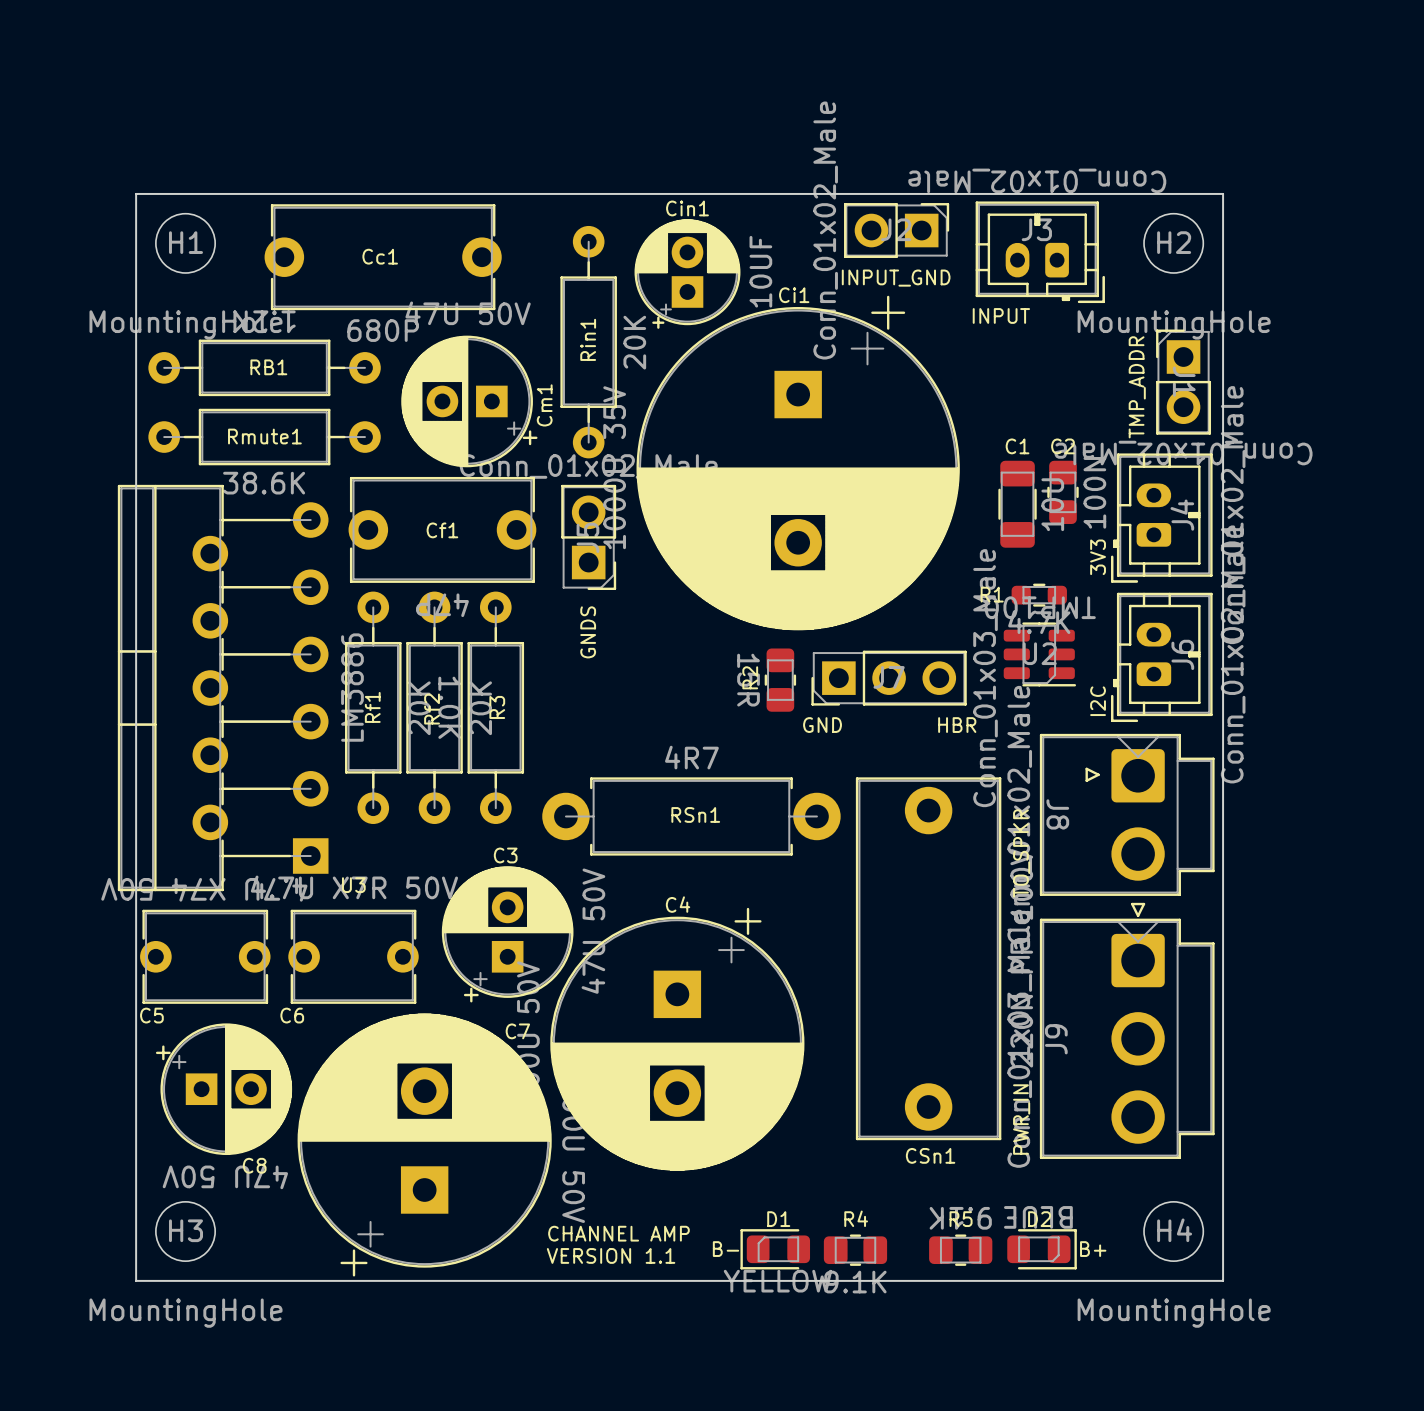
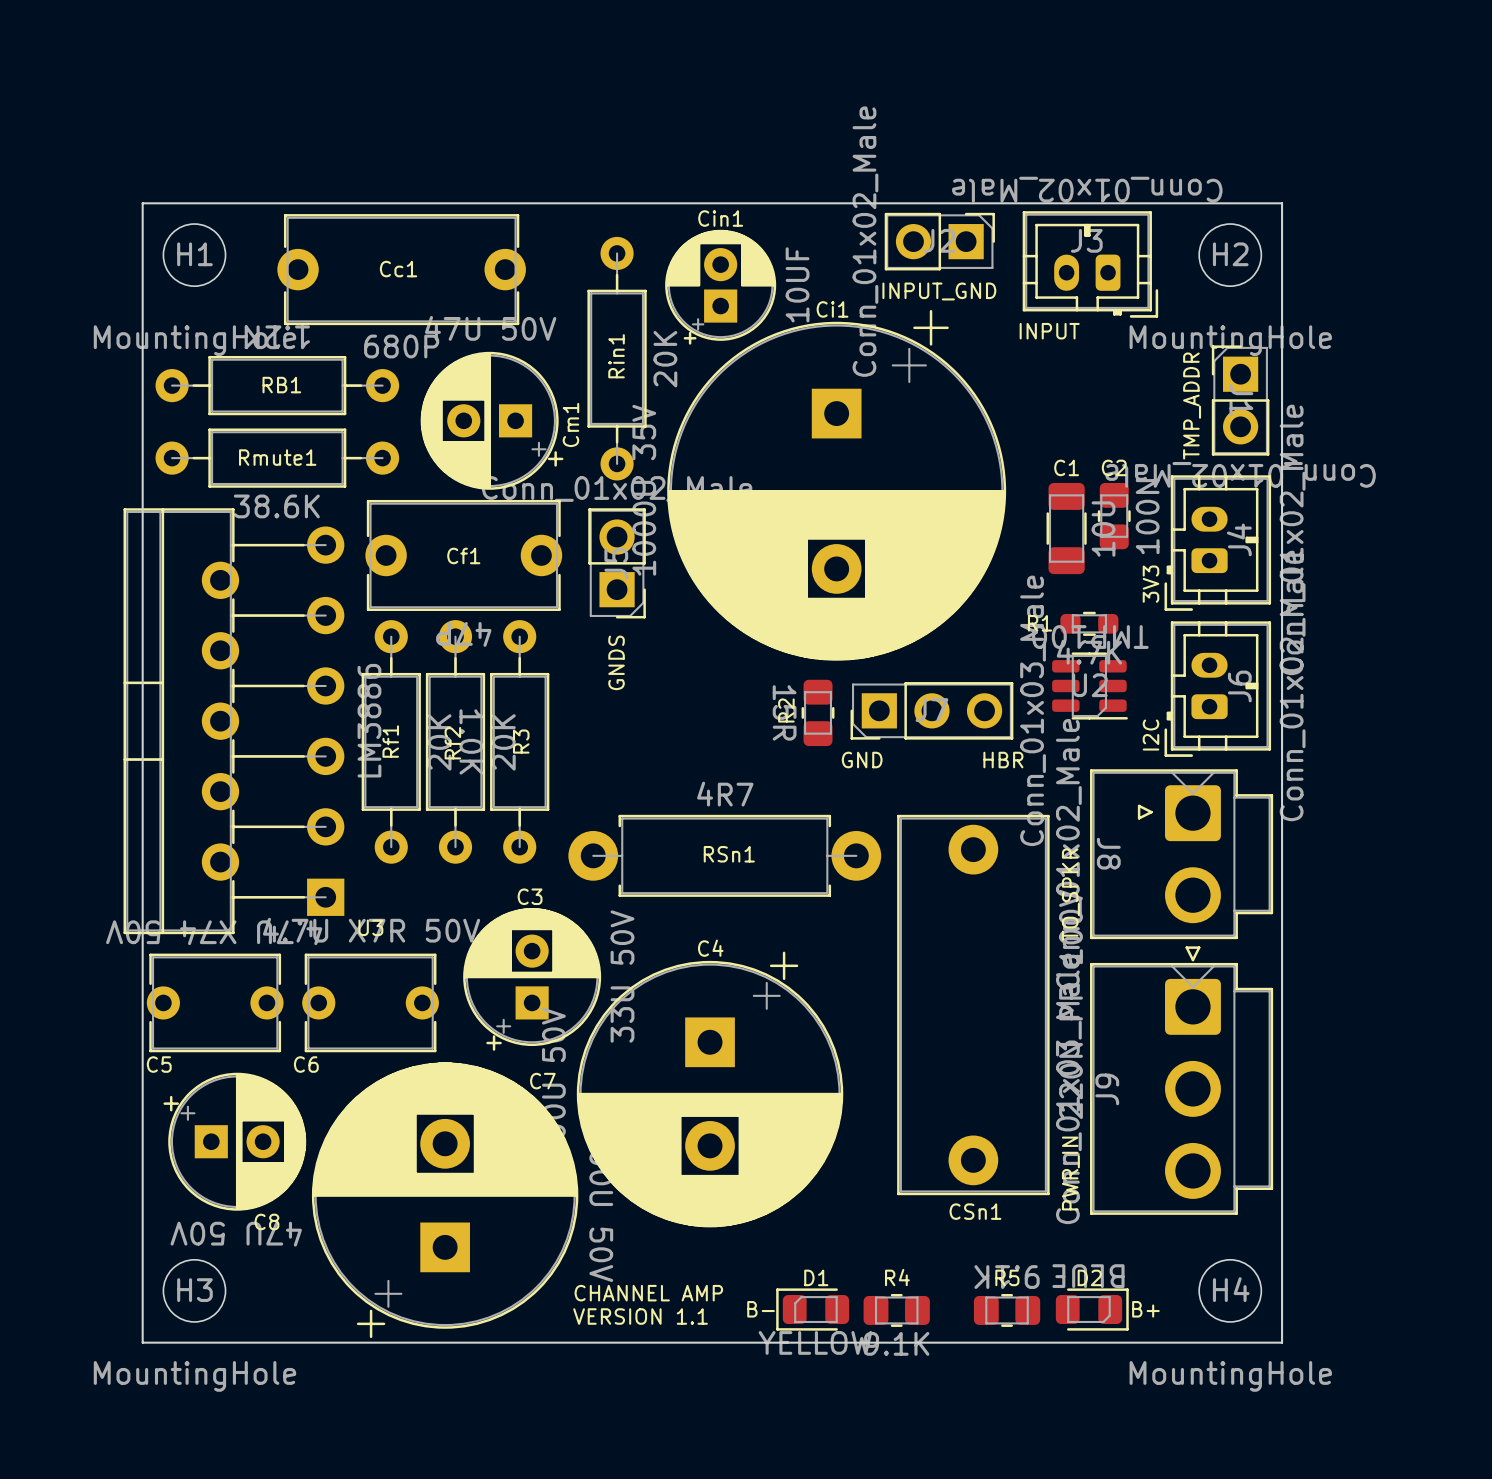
C3 value: 47U 50V (593, 931) -> 33U 50V (622, 976)

